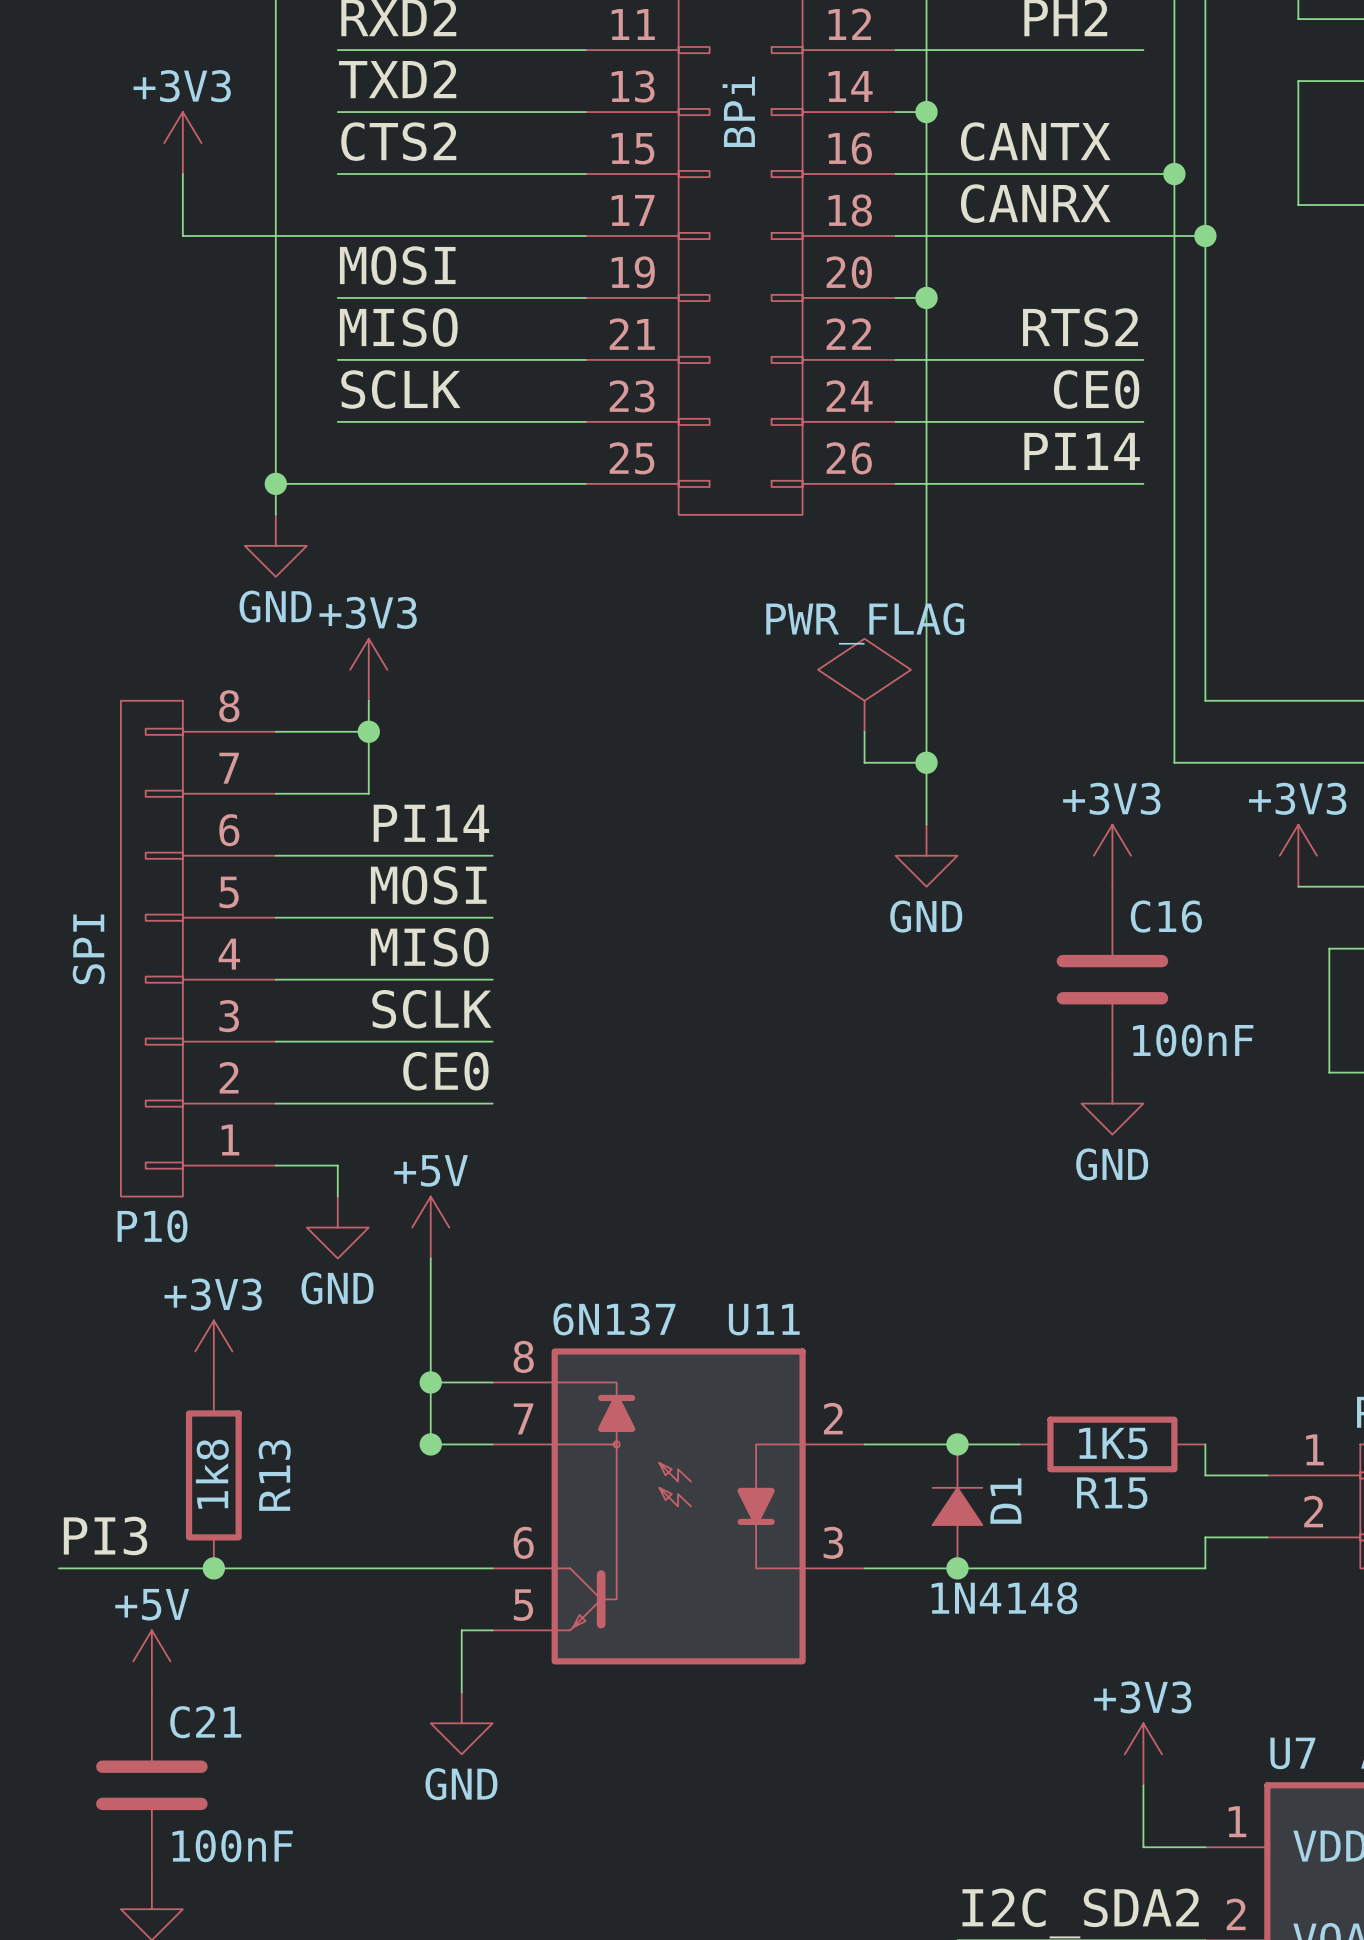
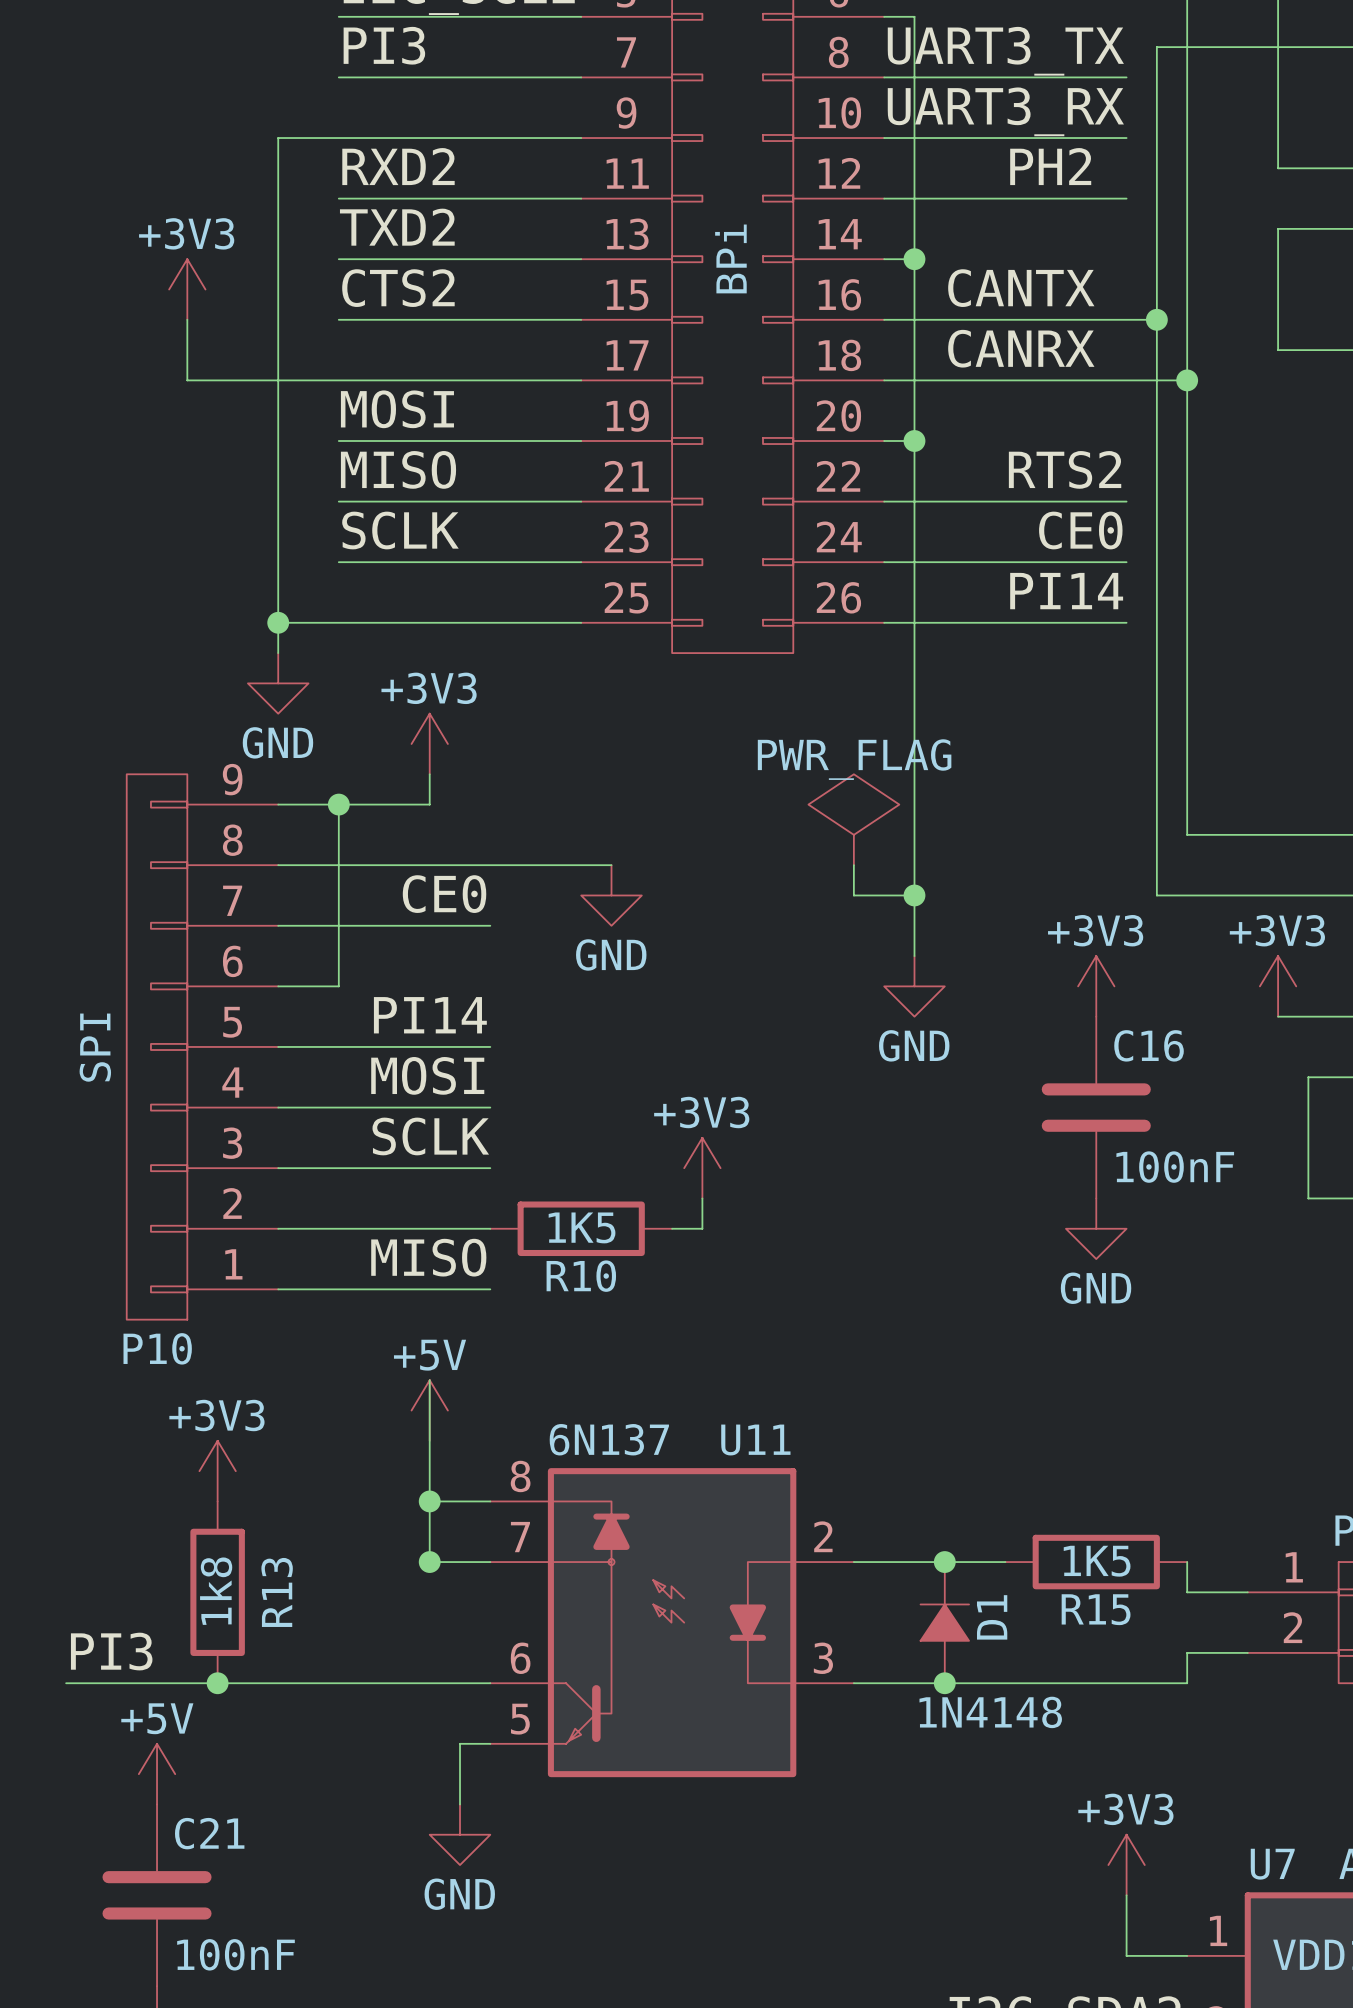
wire: none -> (429, 774) (429, 804) (278, 804)
power symbol position: +3V3 (368, 669) -> +3V3 (429, 743)
P10 symbol: [120, 700, 276, 1197] -> [126, 774, 279, 1320]
wire: (368, 700) (368, 793) -> (490, 925) (369, 925)
wire: none -> (369, 865) (611, 865)
junction position: (368, 731) -> (338, 804)
label: PI14 (431, 823) -> none
wire: (337, 855) (492, 855) -> (338, 986) (338, 804)
label: MOSI (428, 885) -> PI14 (430, 1015)
label: MISO (429, 947) -> MOSI (427, 1075)
power symbol: none -> +3V3 (702, 1168)
label position: CE0 (445, 1071) -> CE0 (444, 894)
wire: none -> (702, 1198) (702, 1228) (672, 1228)
R10: none -> 1K5 (581, 1228)
label: none -> MISO (428, 1257)
wire: (337, 1165) (337, 1196) -> (338, 1289) (490, 1289)
power symbol position: GND (337, 1227) -> GND (611, 895)
power symbol position: +5V (430, 1227) -> +5V (429, 1410)

